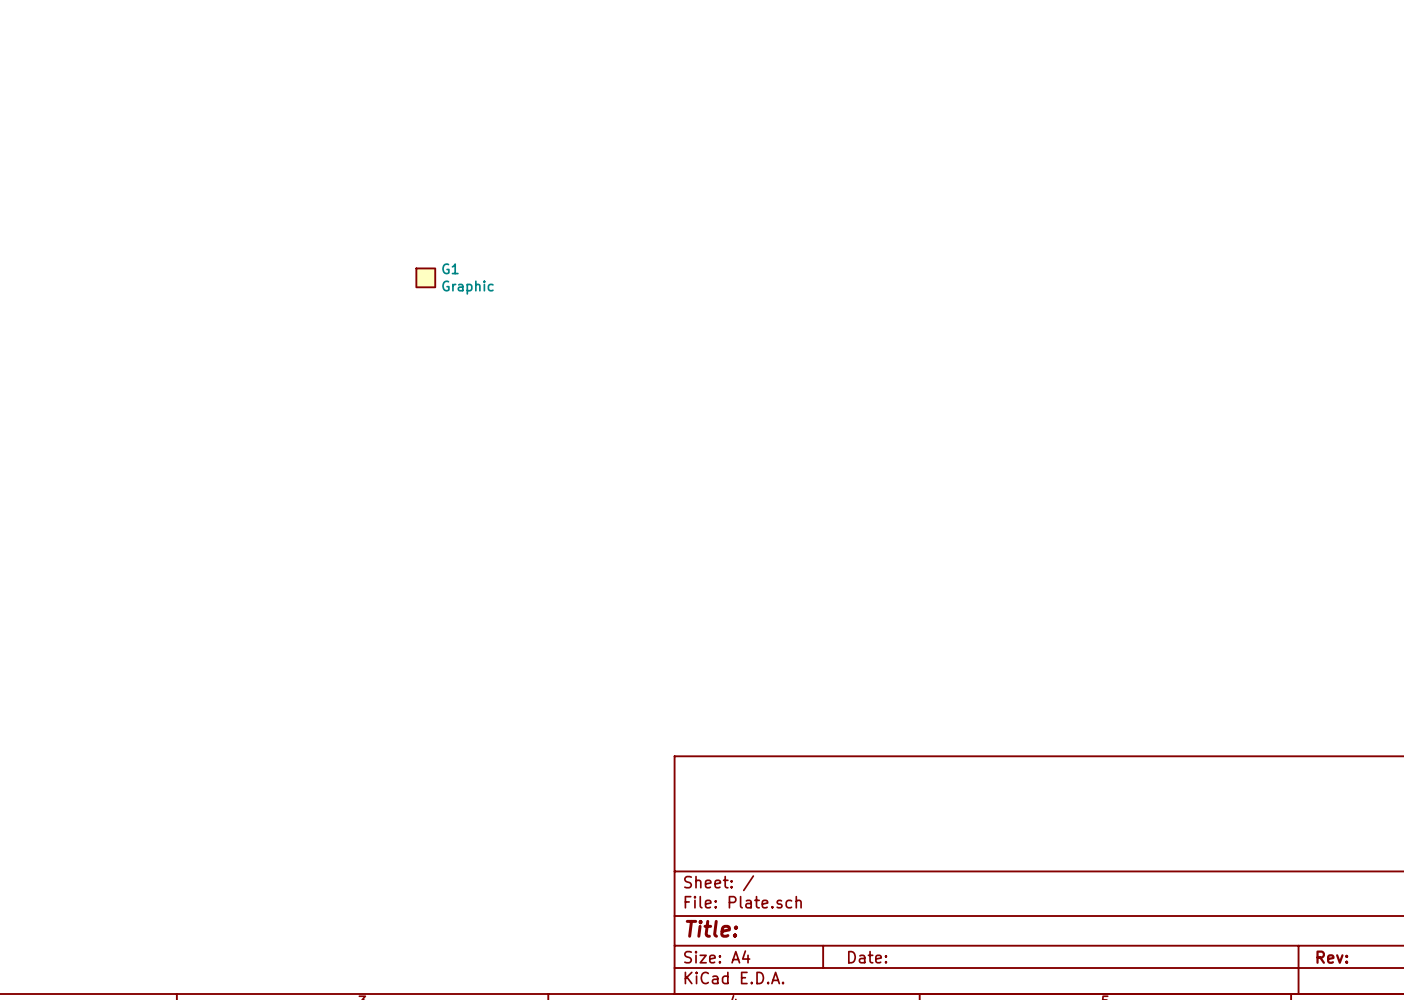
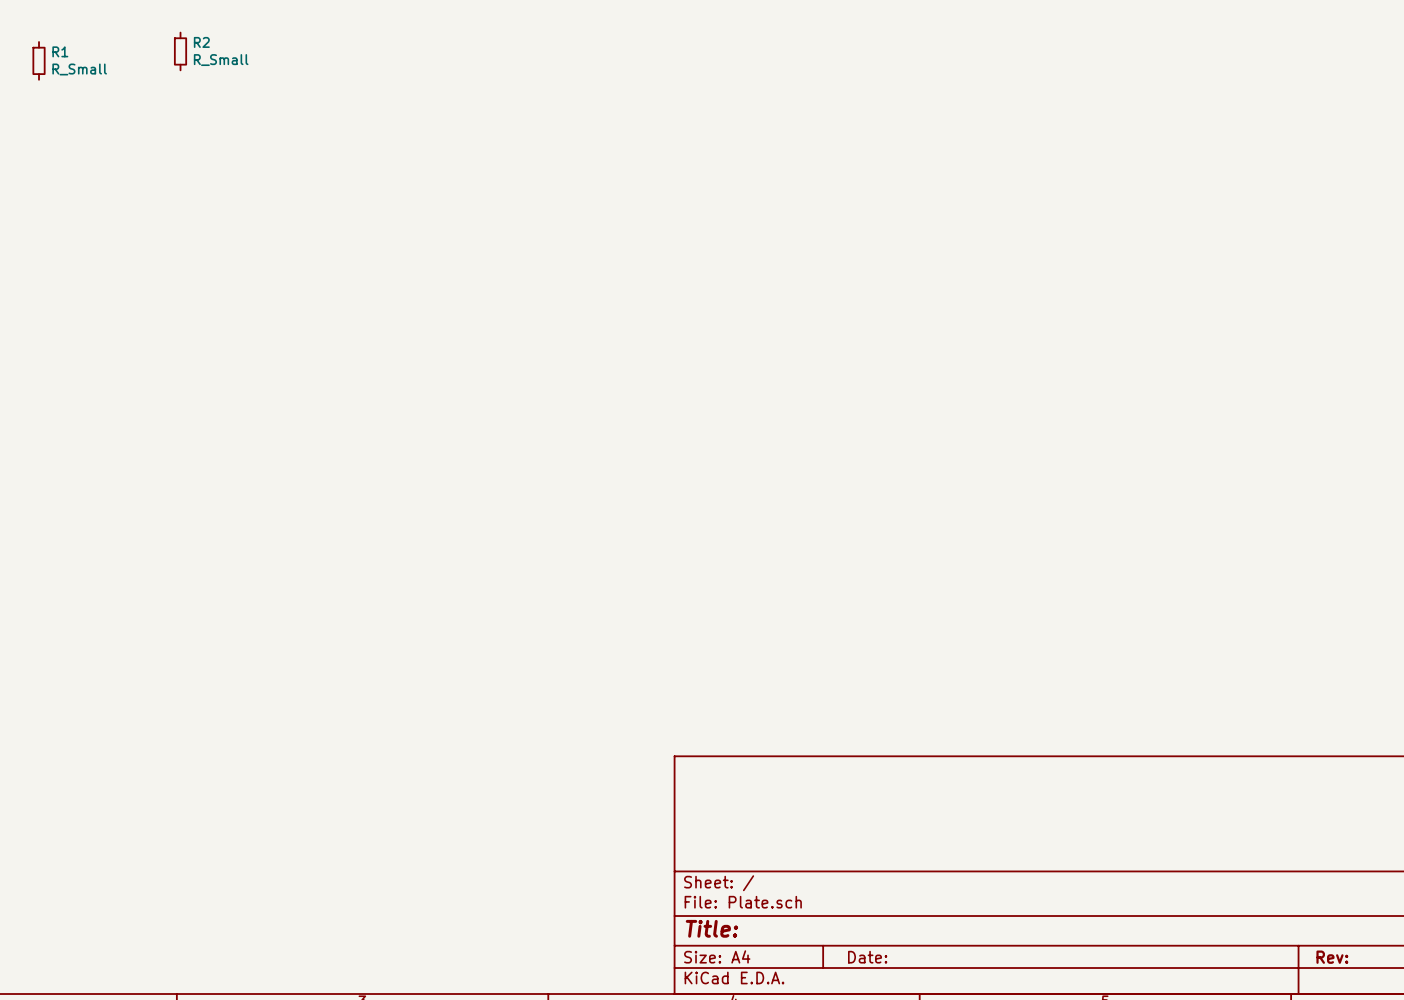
R2: none -> R_Small (180, 51)
R1: none -> R_Small (39, 60)
G1: Graphic (425, 277) -> none

